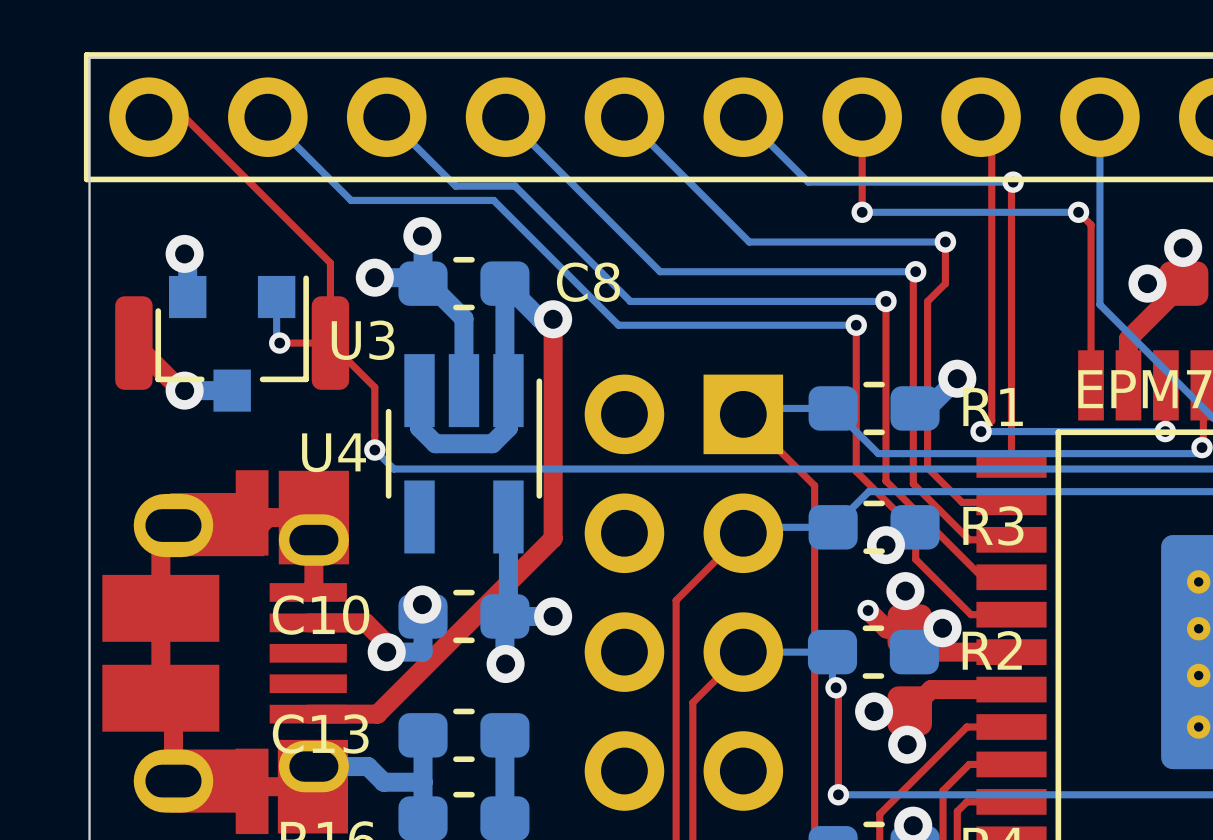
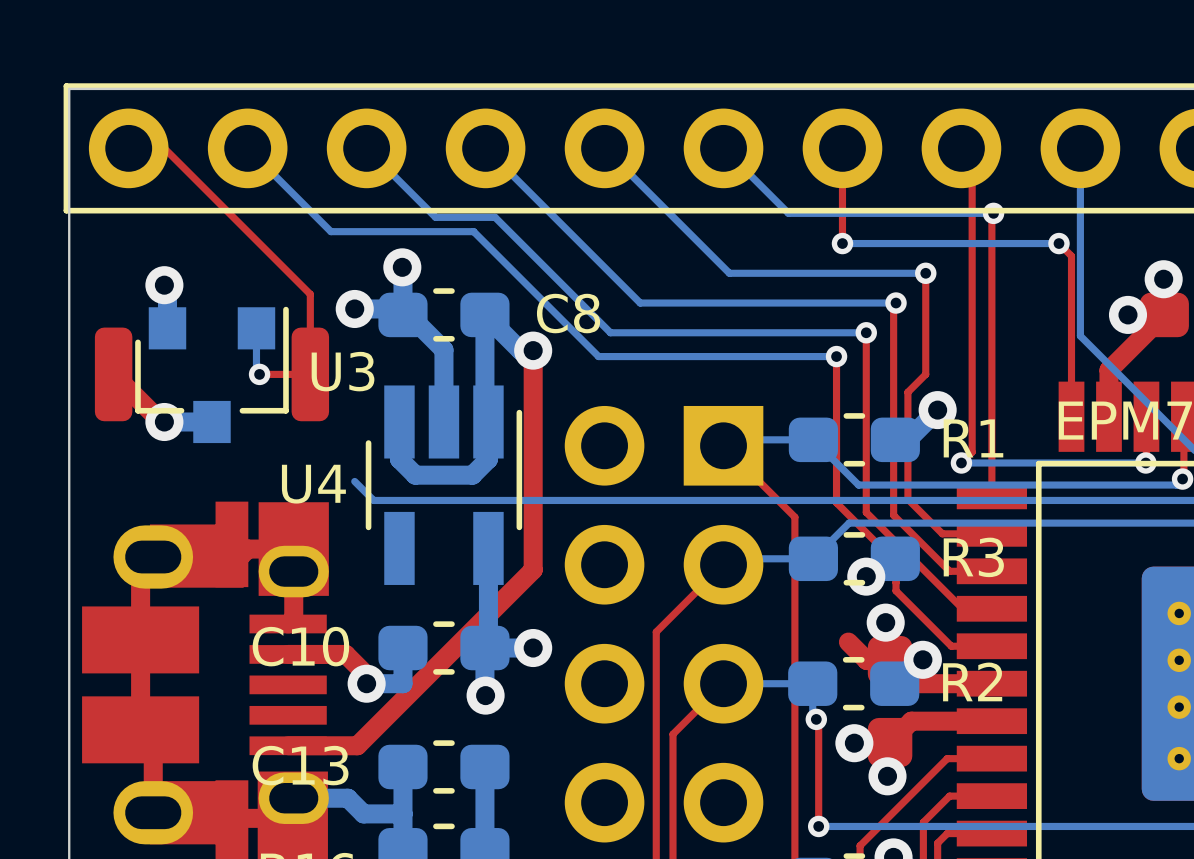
top track: (945, 283) (927, 301) (927, 360) -> (925, 314) (925, 374) (907, 392)
top track: (330, 343) (374, 387) (374, 450) -> none
via: (374, 450) -> none
via: (422, 604) -> none
via: (868, 610) -> none

